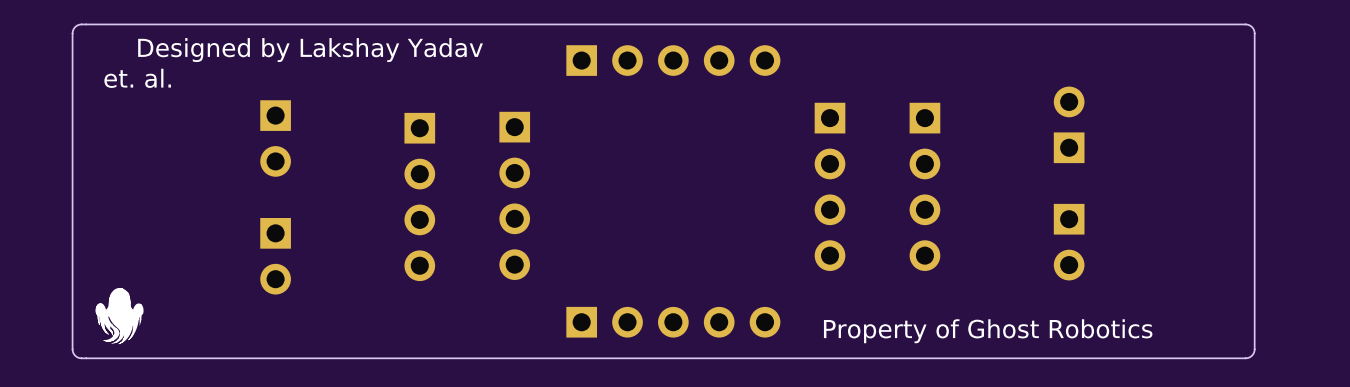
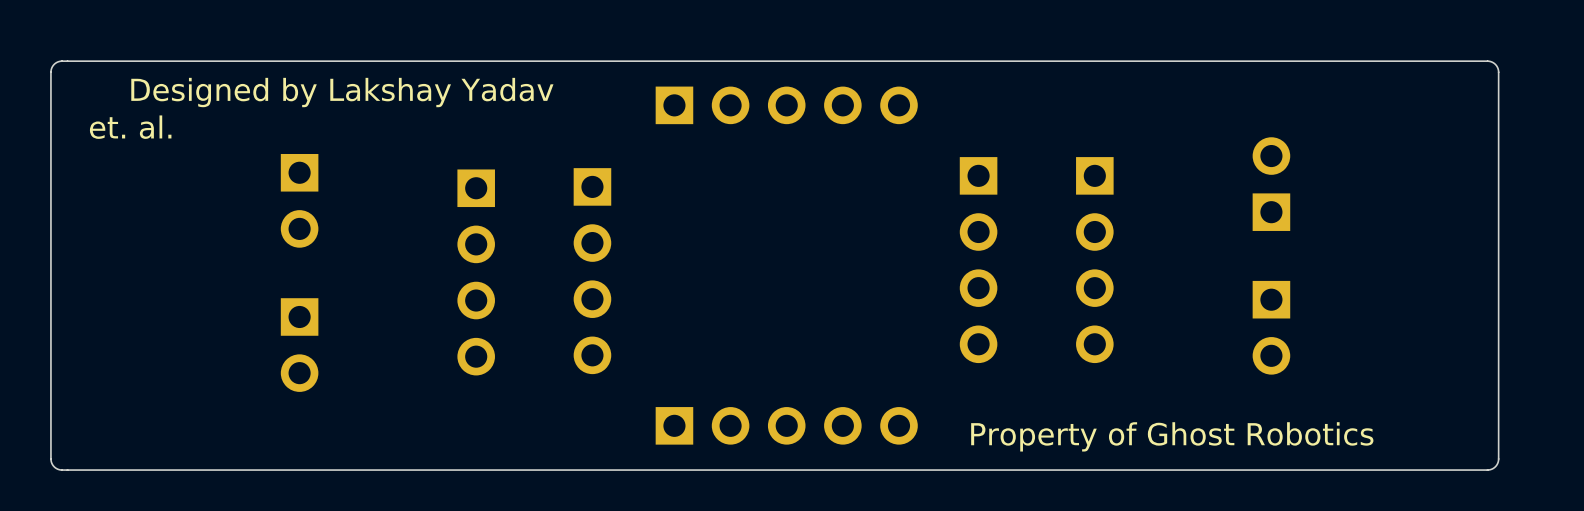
drawing: [95, 287, 144, 345] -> none

